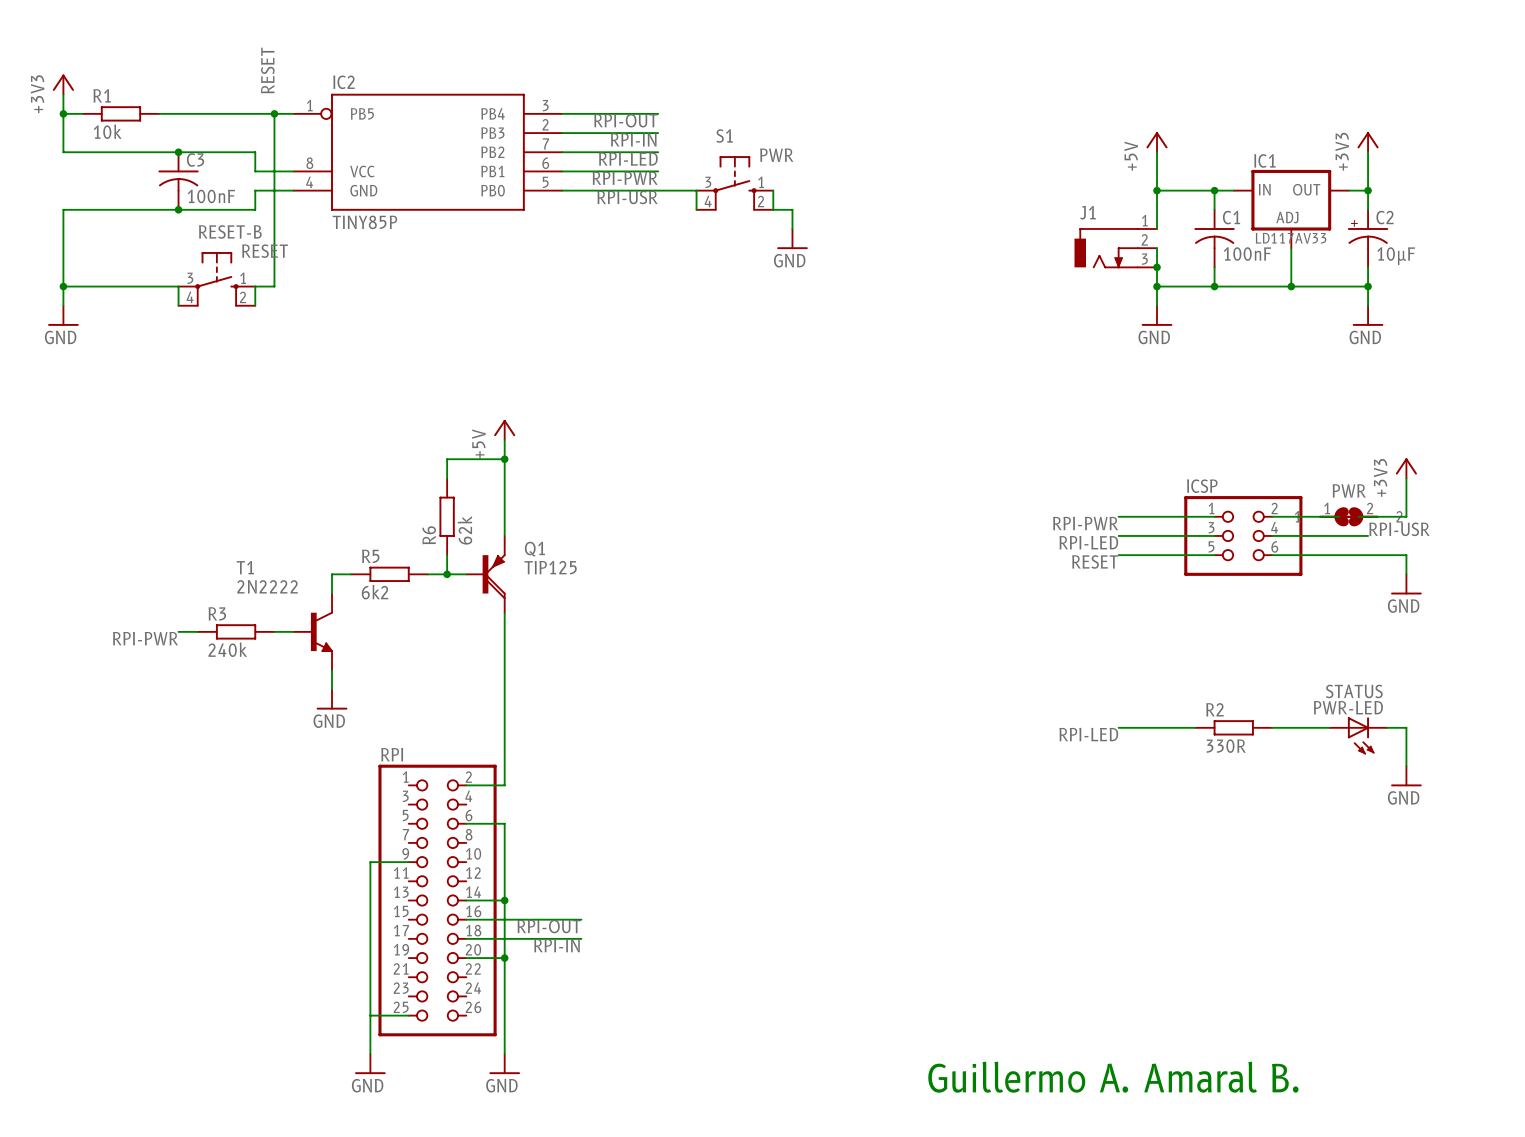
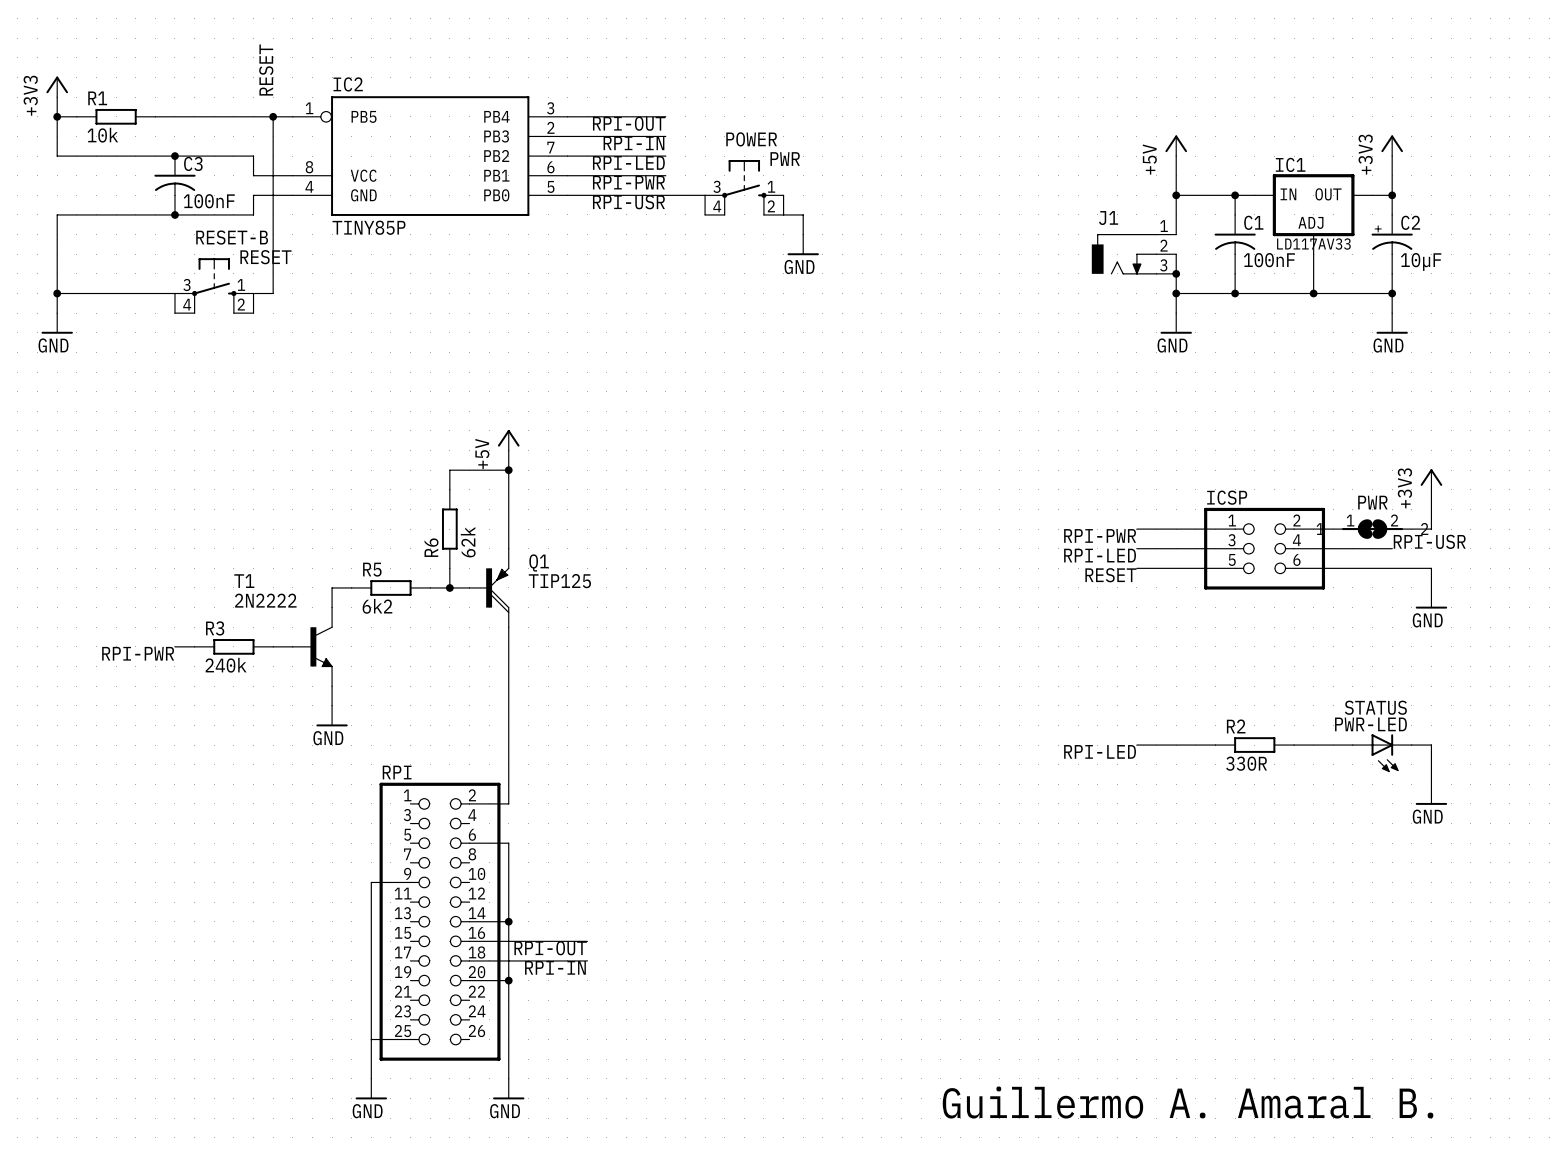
S1 name: S1 (724, 136) -> POWER (751, 139)

